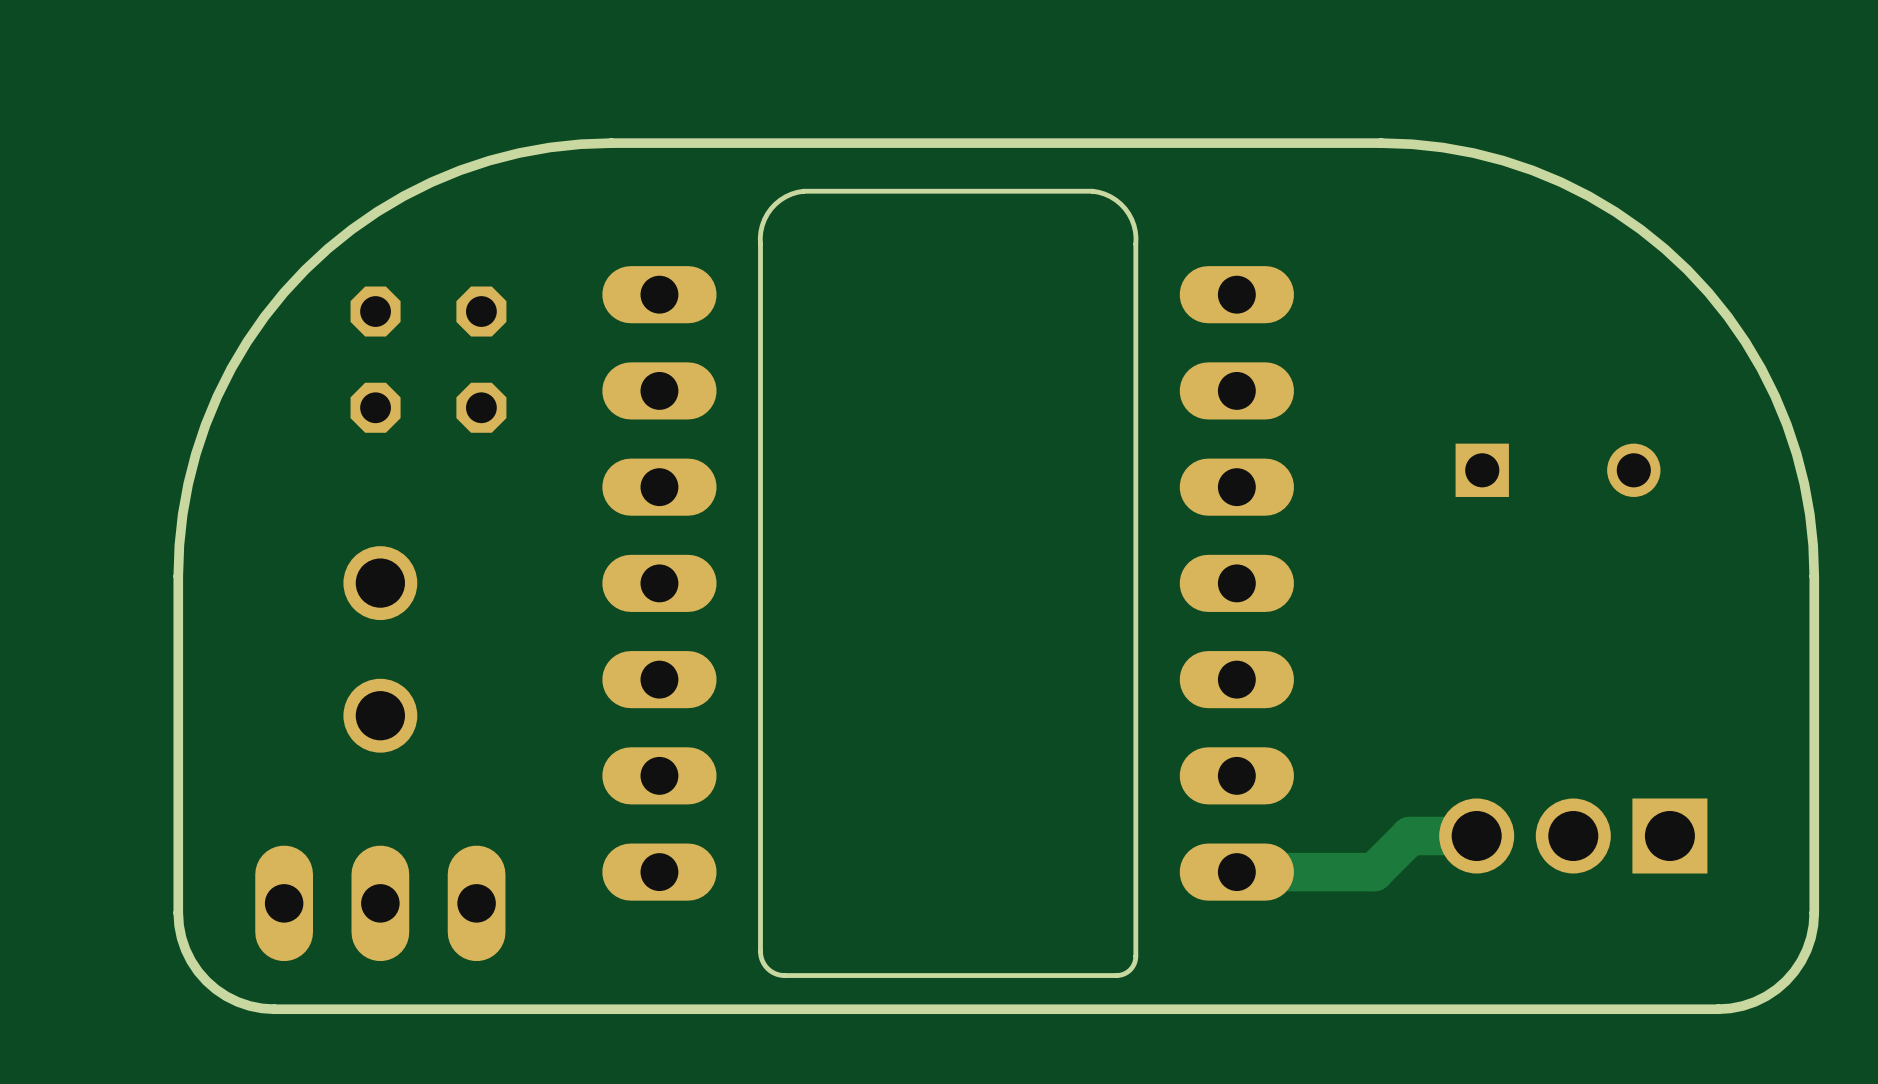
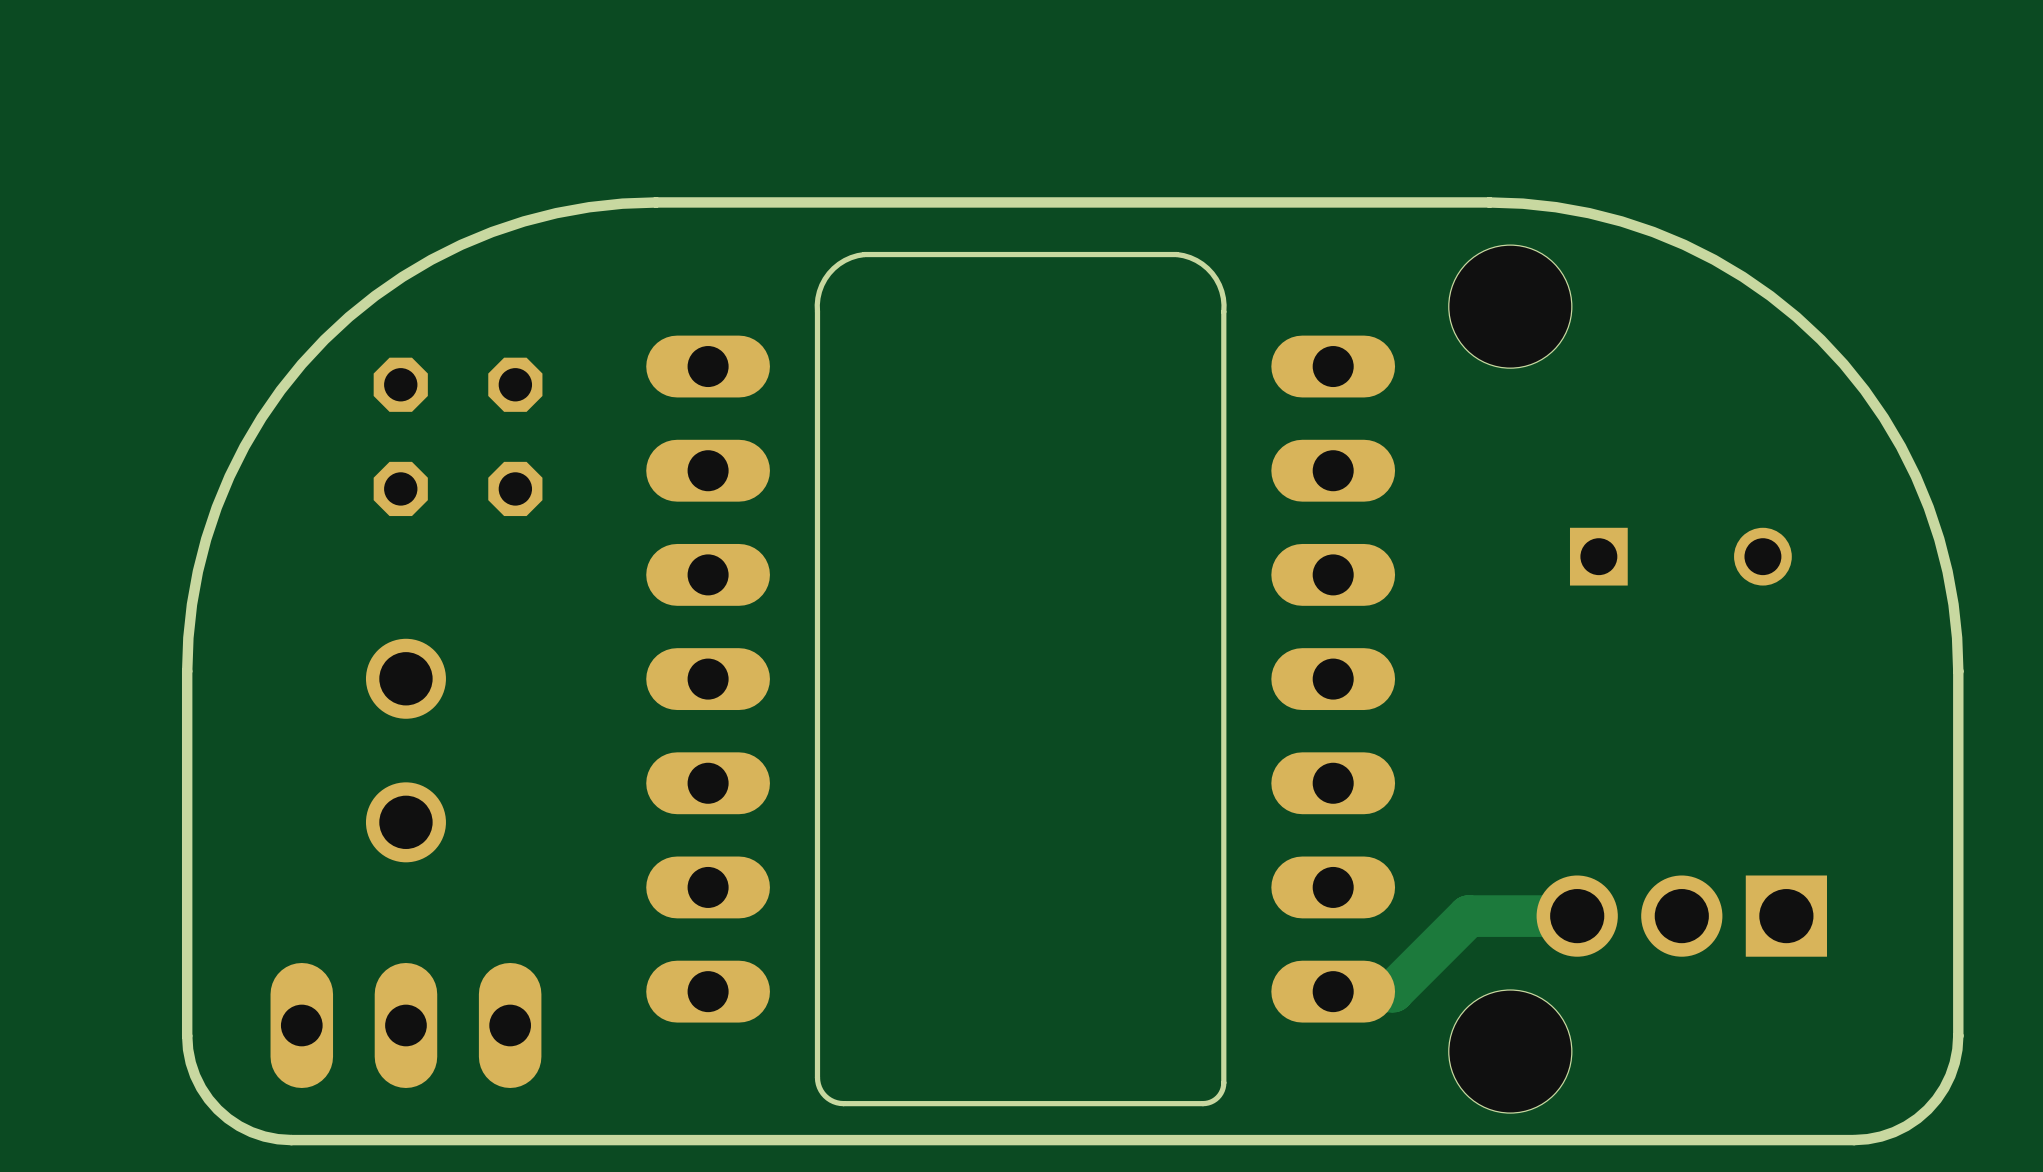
hole: none -> (1510, 306)
track: (1476, 836) (1410, 836) (1373, 872) (1292, 872) -> (1577, 916) (1468, 916) (1393, 991)
part position: (1573, 836) -> (1681, 916)
hole: none -> (1510, 1051)

